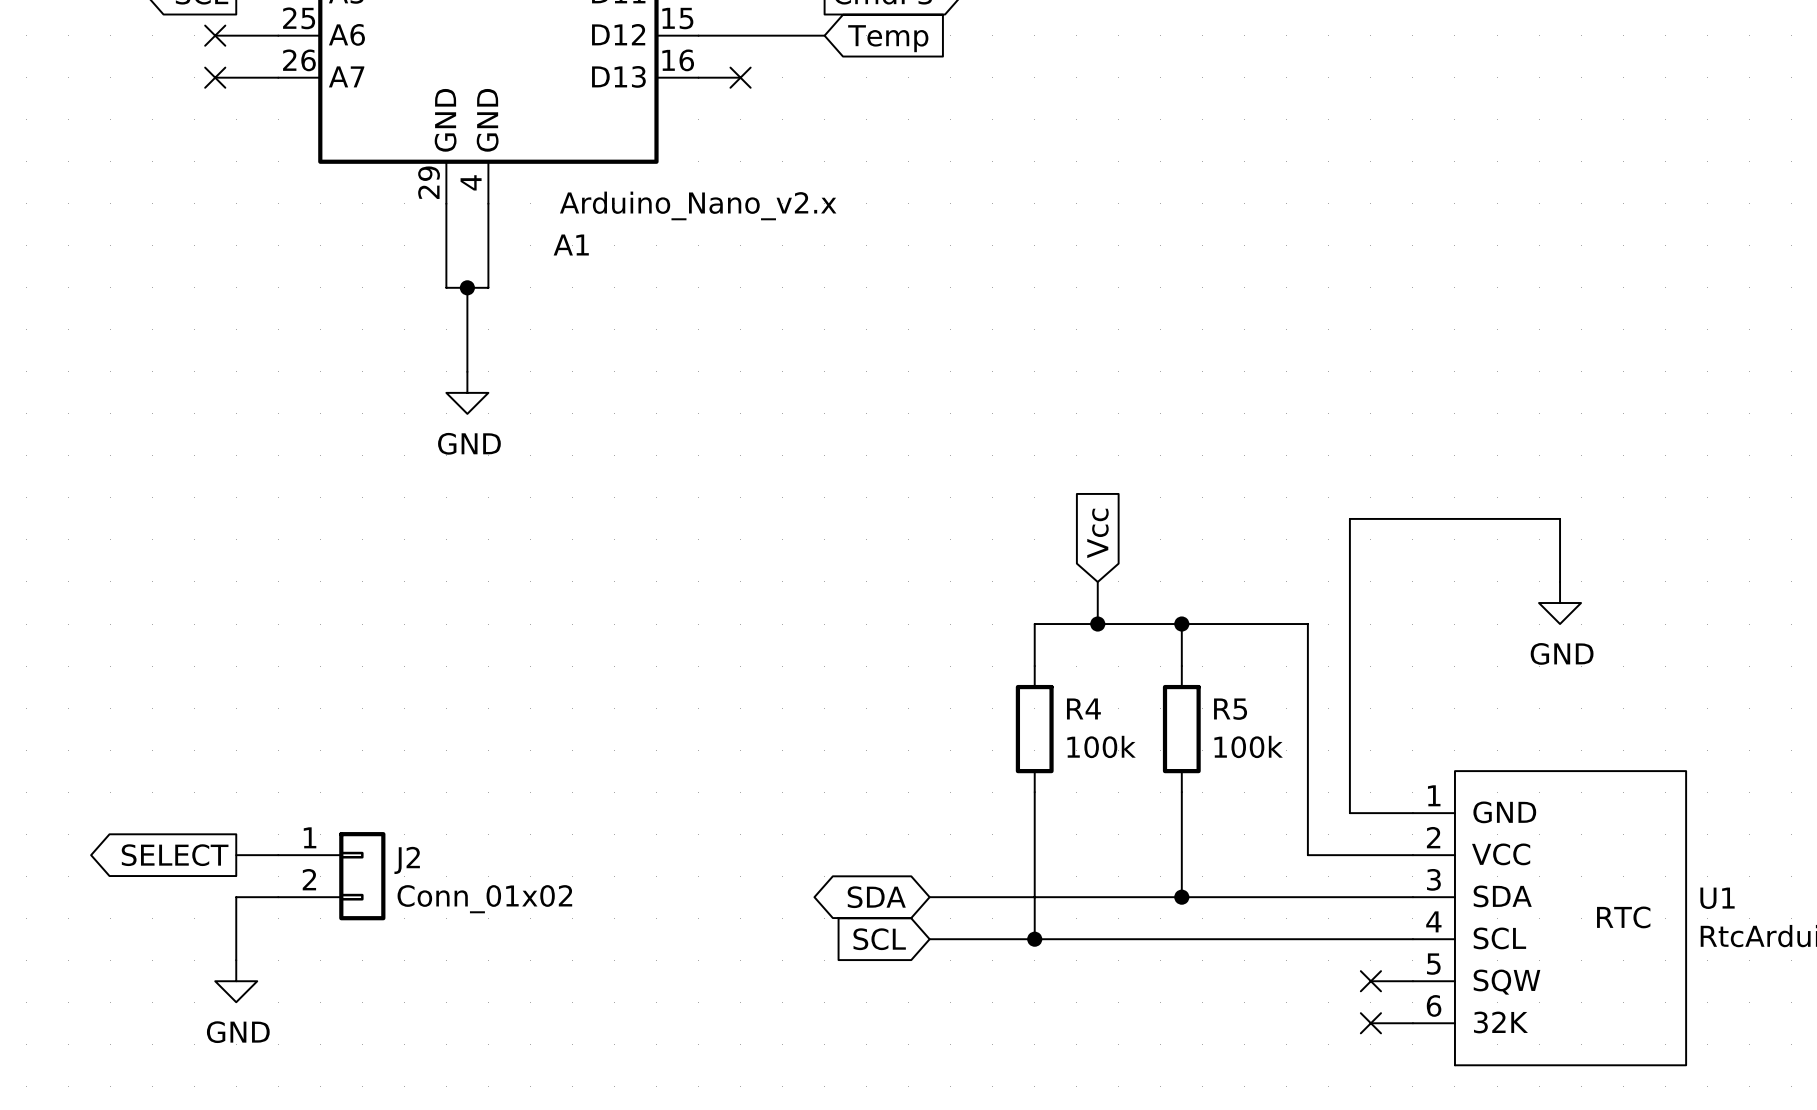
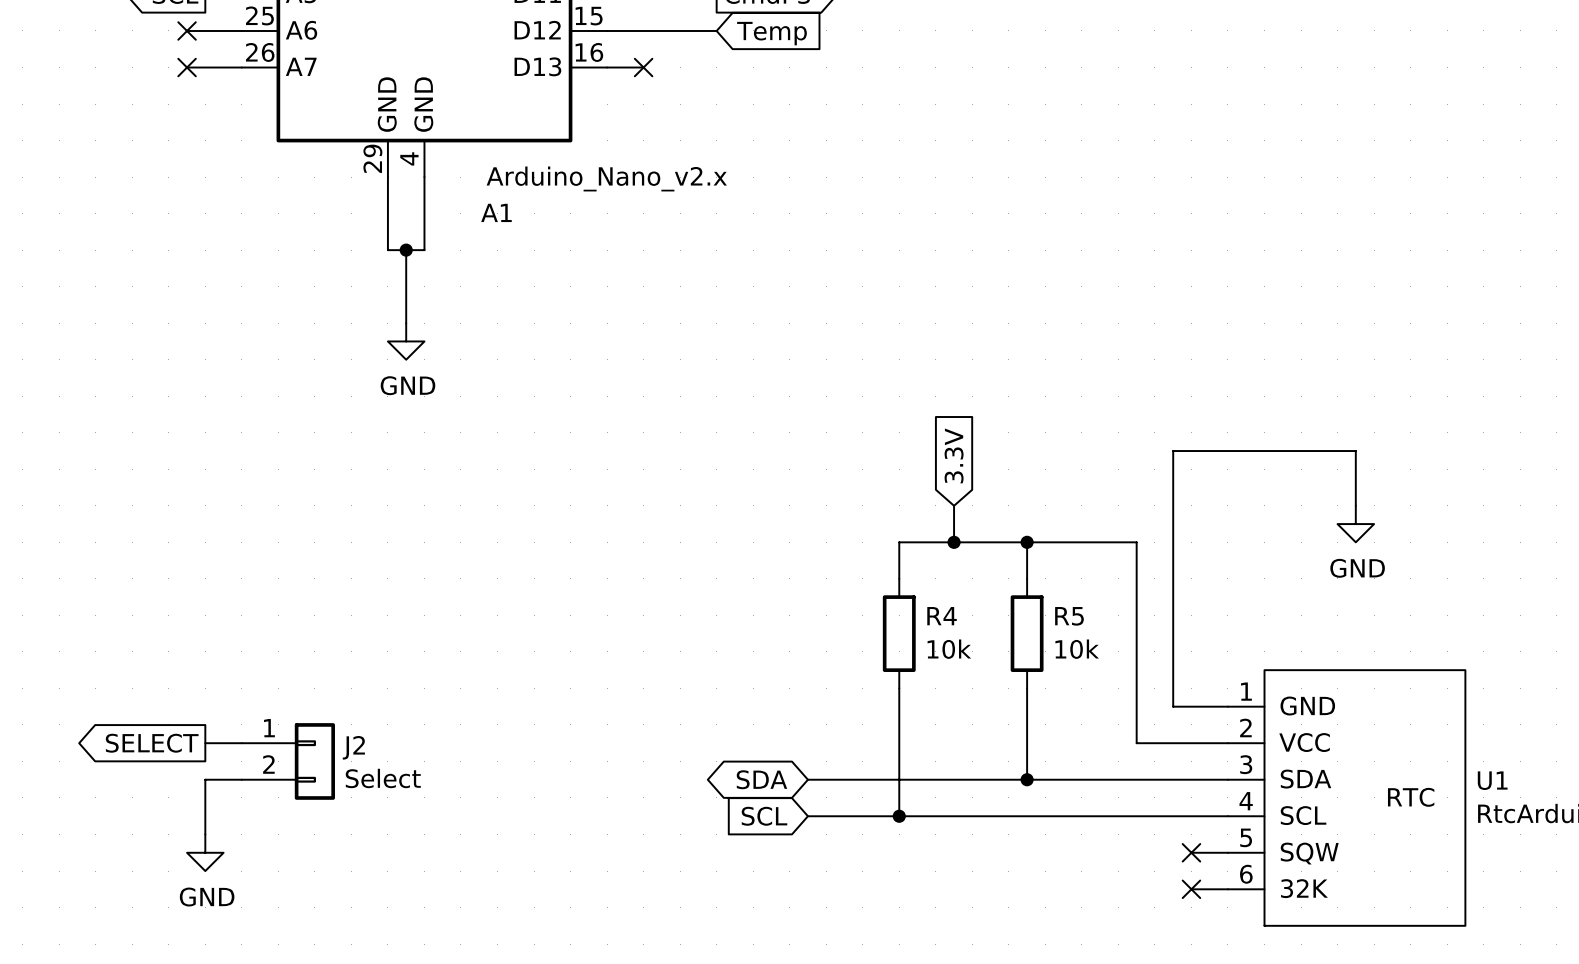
global label: Vcc (1097, 533) -> 3.3V (954, 455)
R4 value: 100k (1101, 746) -> 10k (949, 649)
R5 value: 100k (1248, 746) -> 10k (1077, 649)
J2 value: Conn_01x02 (484, 899) -> Select (383, 778)

